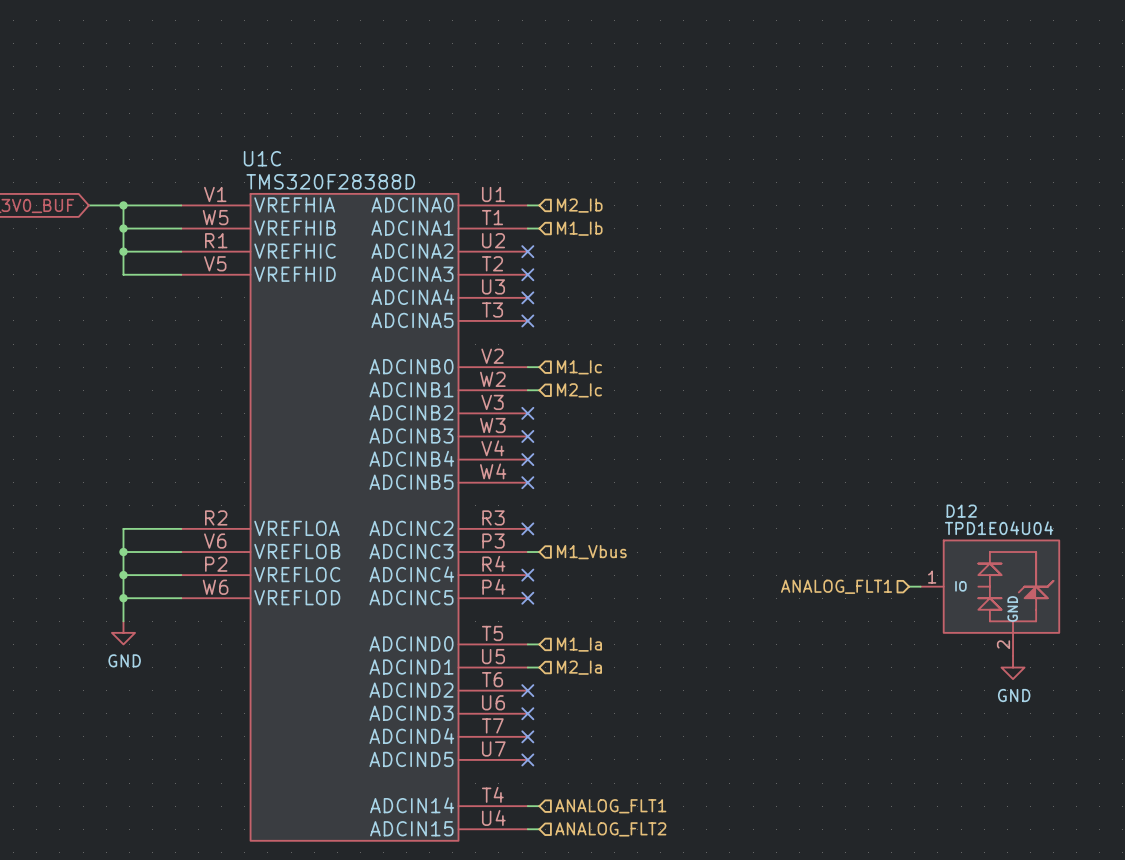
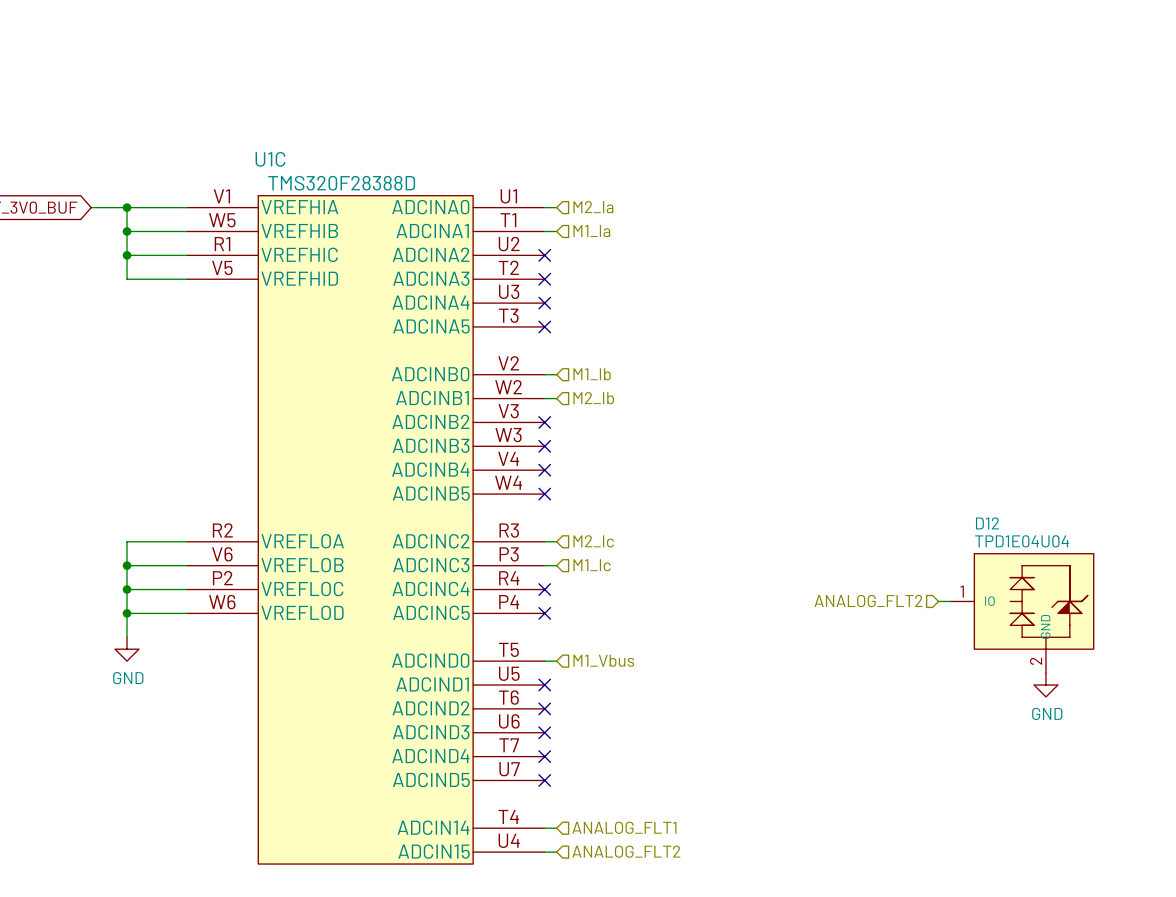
hierarchical label: M2_Ib (579, 205) -> M2_Ia (593, 207)
hierarchical label: M1_Ib (579, 228) -> M1_Ia (591, 231)
hierarchical label: M1_Ic (579, 367) -> M1_Ib (592, 374)
hierarchical label: M2_Ic (579, 390) -> M2_Ib (593, 398)
no-connect mark: (527, 528) -> none
hierarchical label: none -> M2_Ic (593, 541)
hierarchical label: M1_Vbus (591, 552) -> M1_Ic (592, 565)
hierarchical label: ANALOG_FLT1 (836, 586) -> ANALOG_FLT2 (868, 601)
hierarchical label: M1_Ia (579, 644) -> M1_Vbus (603, 660)
wire: (527, 667) (539, 667) -> (544, 541) (556, 541)
no-connect mark: none -> (544, 685)
hierarchical label: M2_Ia (579, 667) -> none

